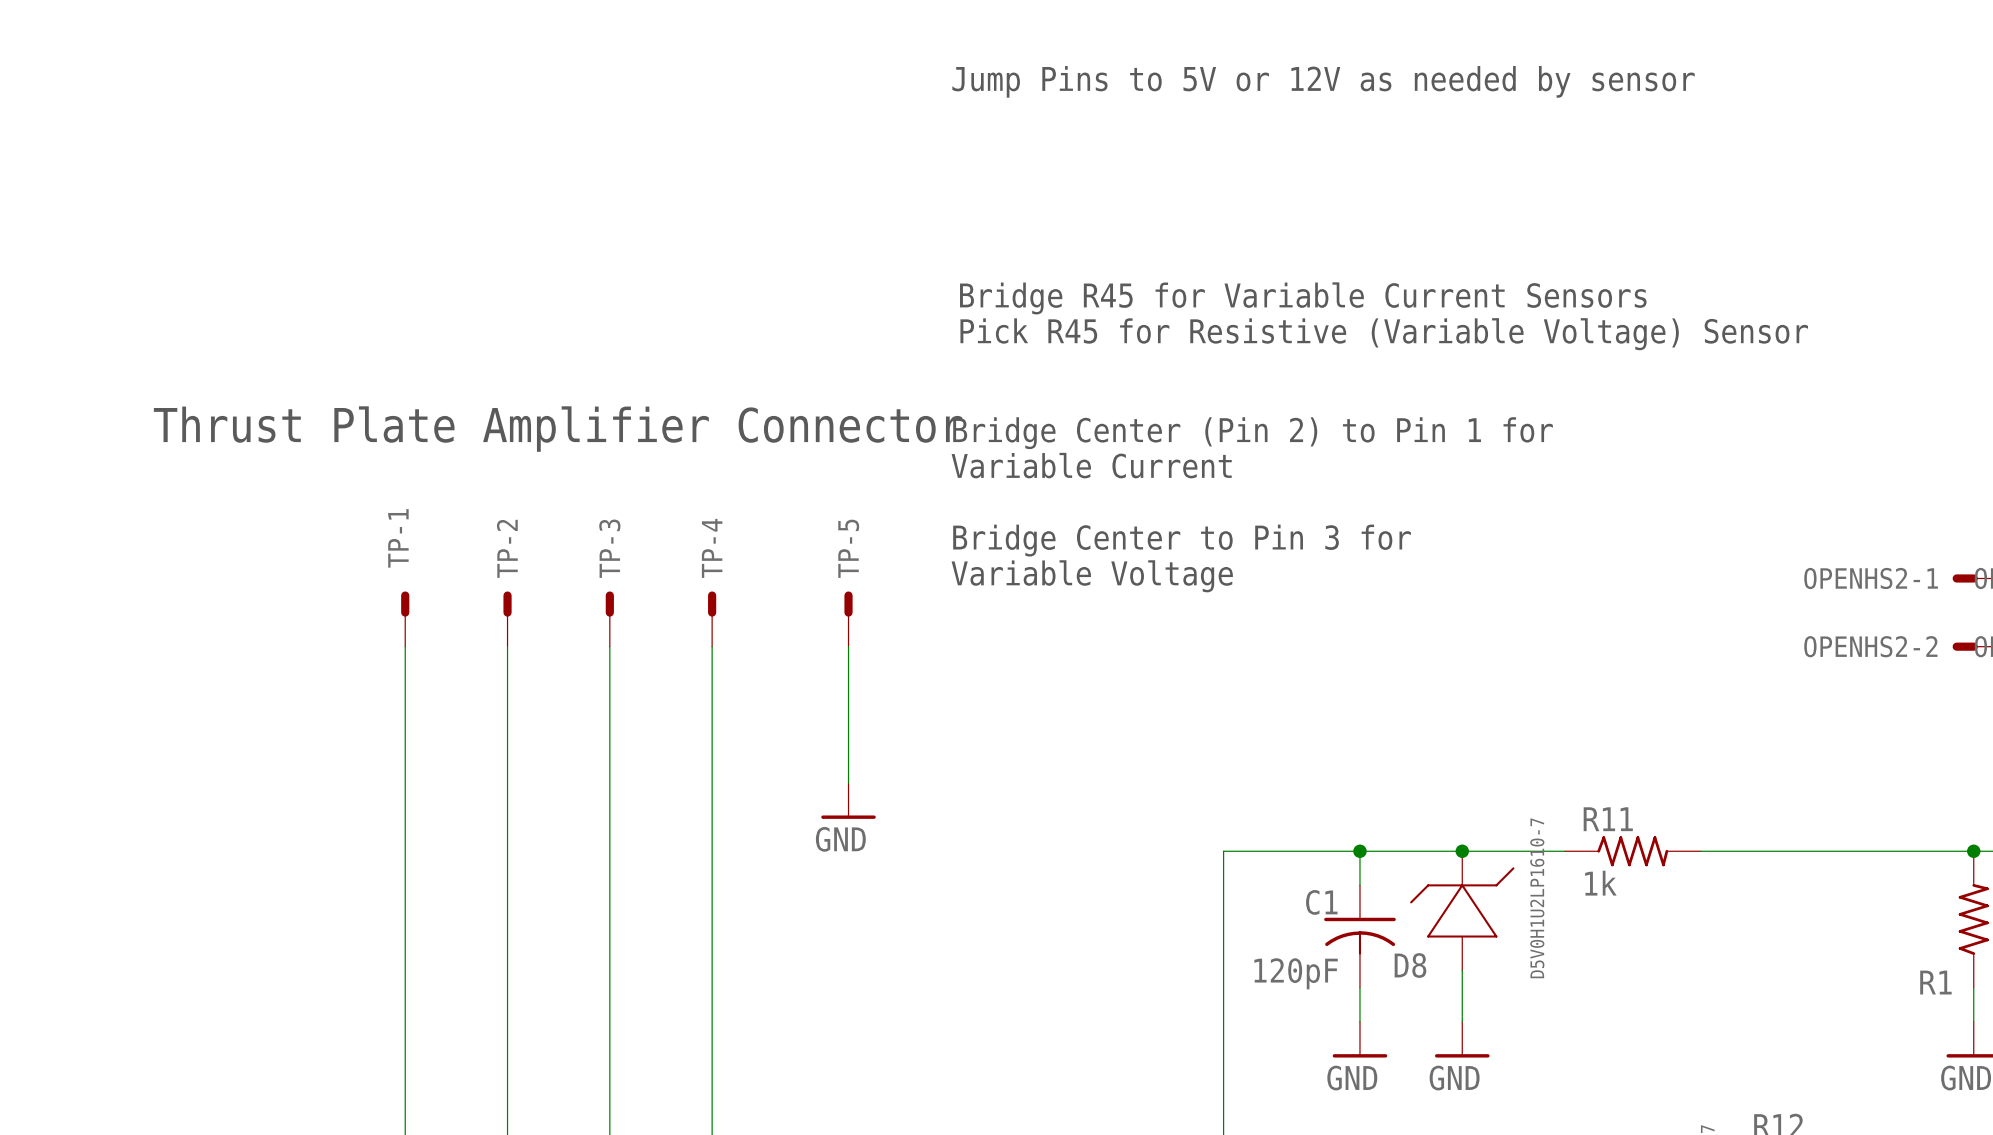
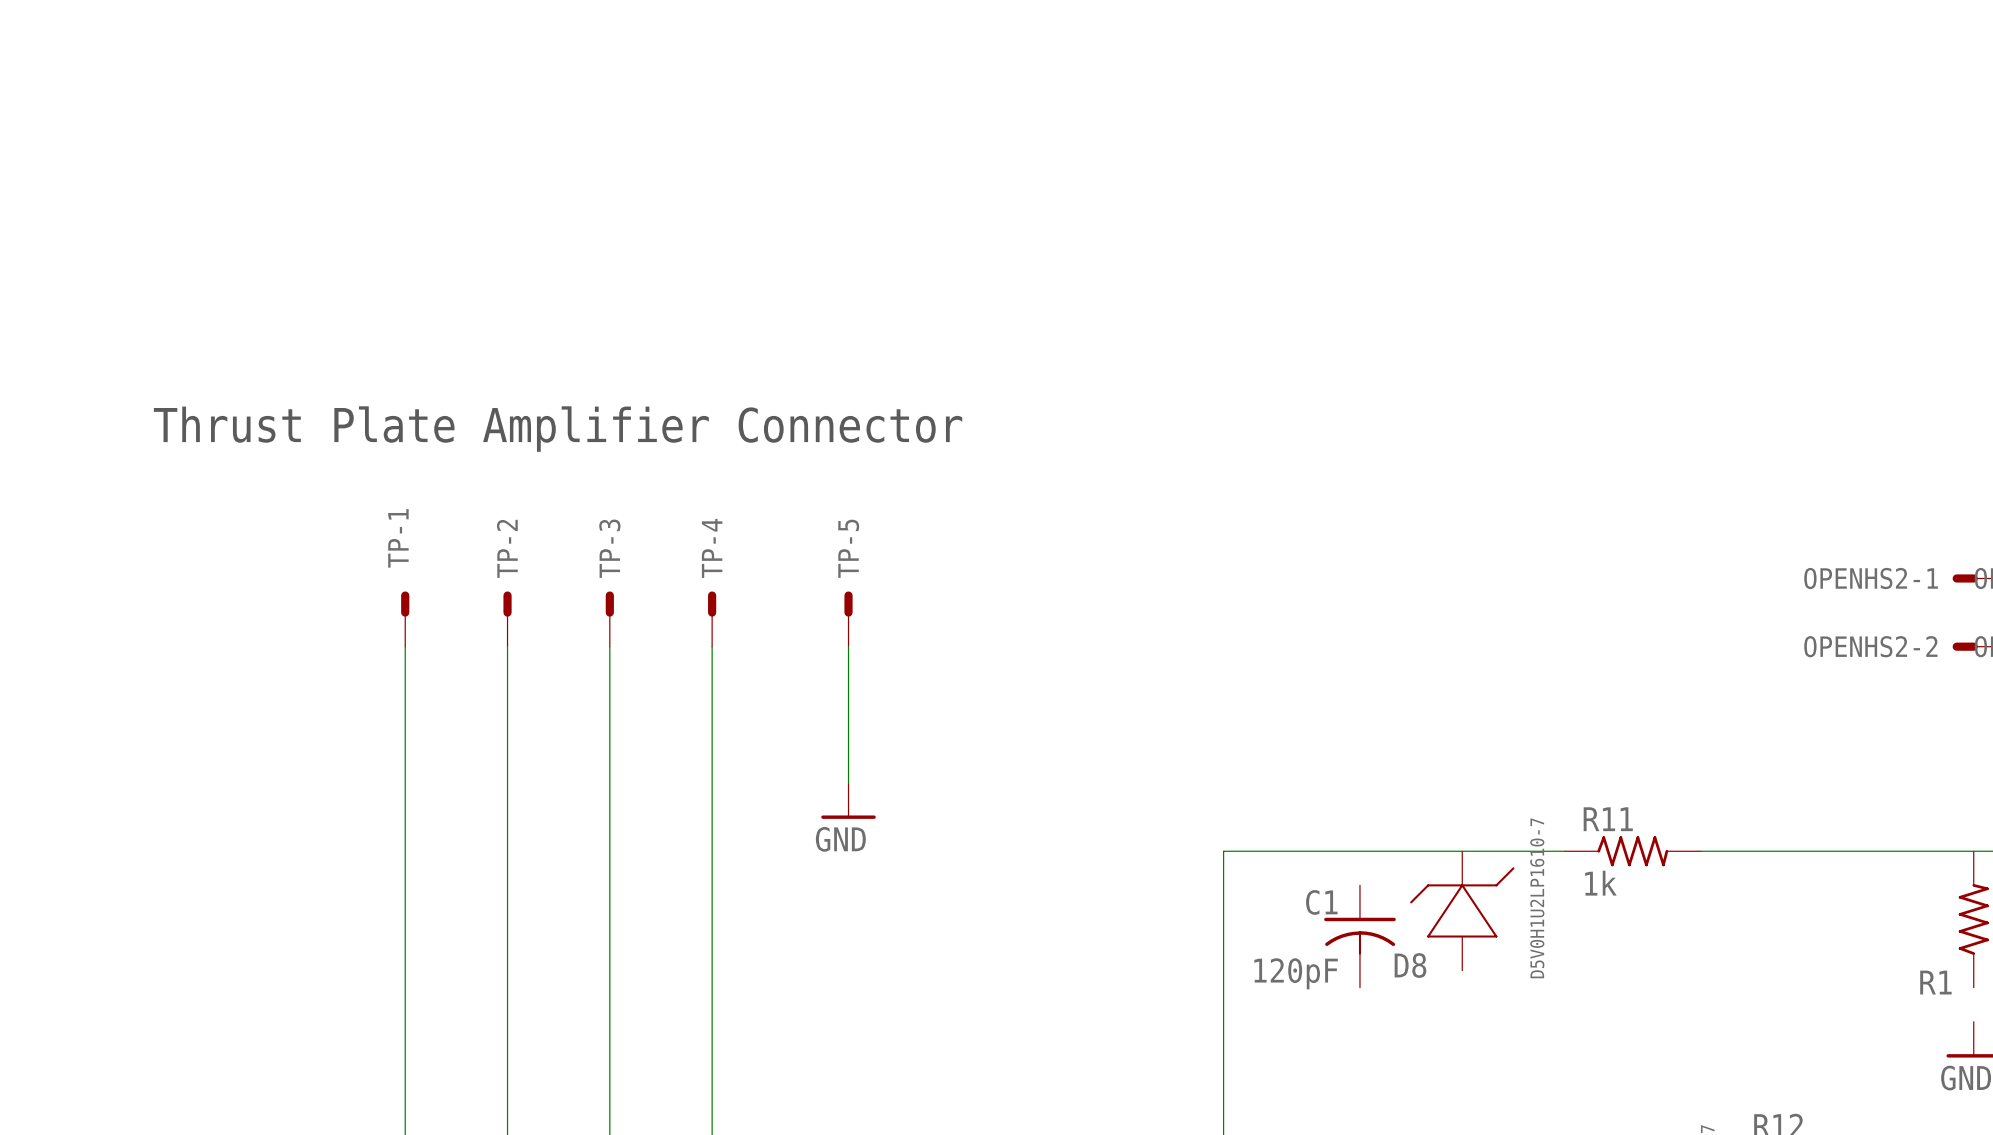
text: Jump Pins to 5V or 12V as needed by sensor (1323, 81) -> none
text: Bridge R45 for Variable Current Sensors (1303, 298) -> none
text: Pick R45 for Resistive (Variable Voltage) Sensor (1384, 334) -> none
text: Bridge Center (Pin 2) to Pin 1 for (1253, 433) -> none
text: Variable Current (1091, 465) -> none
text: Bridge Center to Pin 3 for (1182, 540) -> none
text: Variable Voltage (1092, 576) -> none
wire: (1359, 851) (1359, 885) -> none
junction: (1359, 851) -> none
junction: (1462, 851) -> none
junction: (1973, 851) -> none
wire: (1462, 970) (1462, 1021) -> none
wire: (1359, 987) (1359, 1021) -> none
wire: (1973, 987) (1973, 1021) -> none
power symbol: GND (1359, 1039) -> none
power symbol: GND (1462, 1039) -> none

